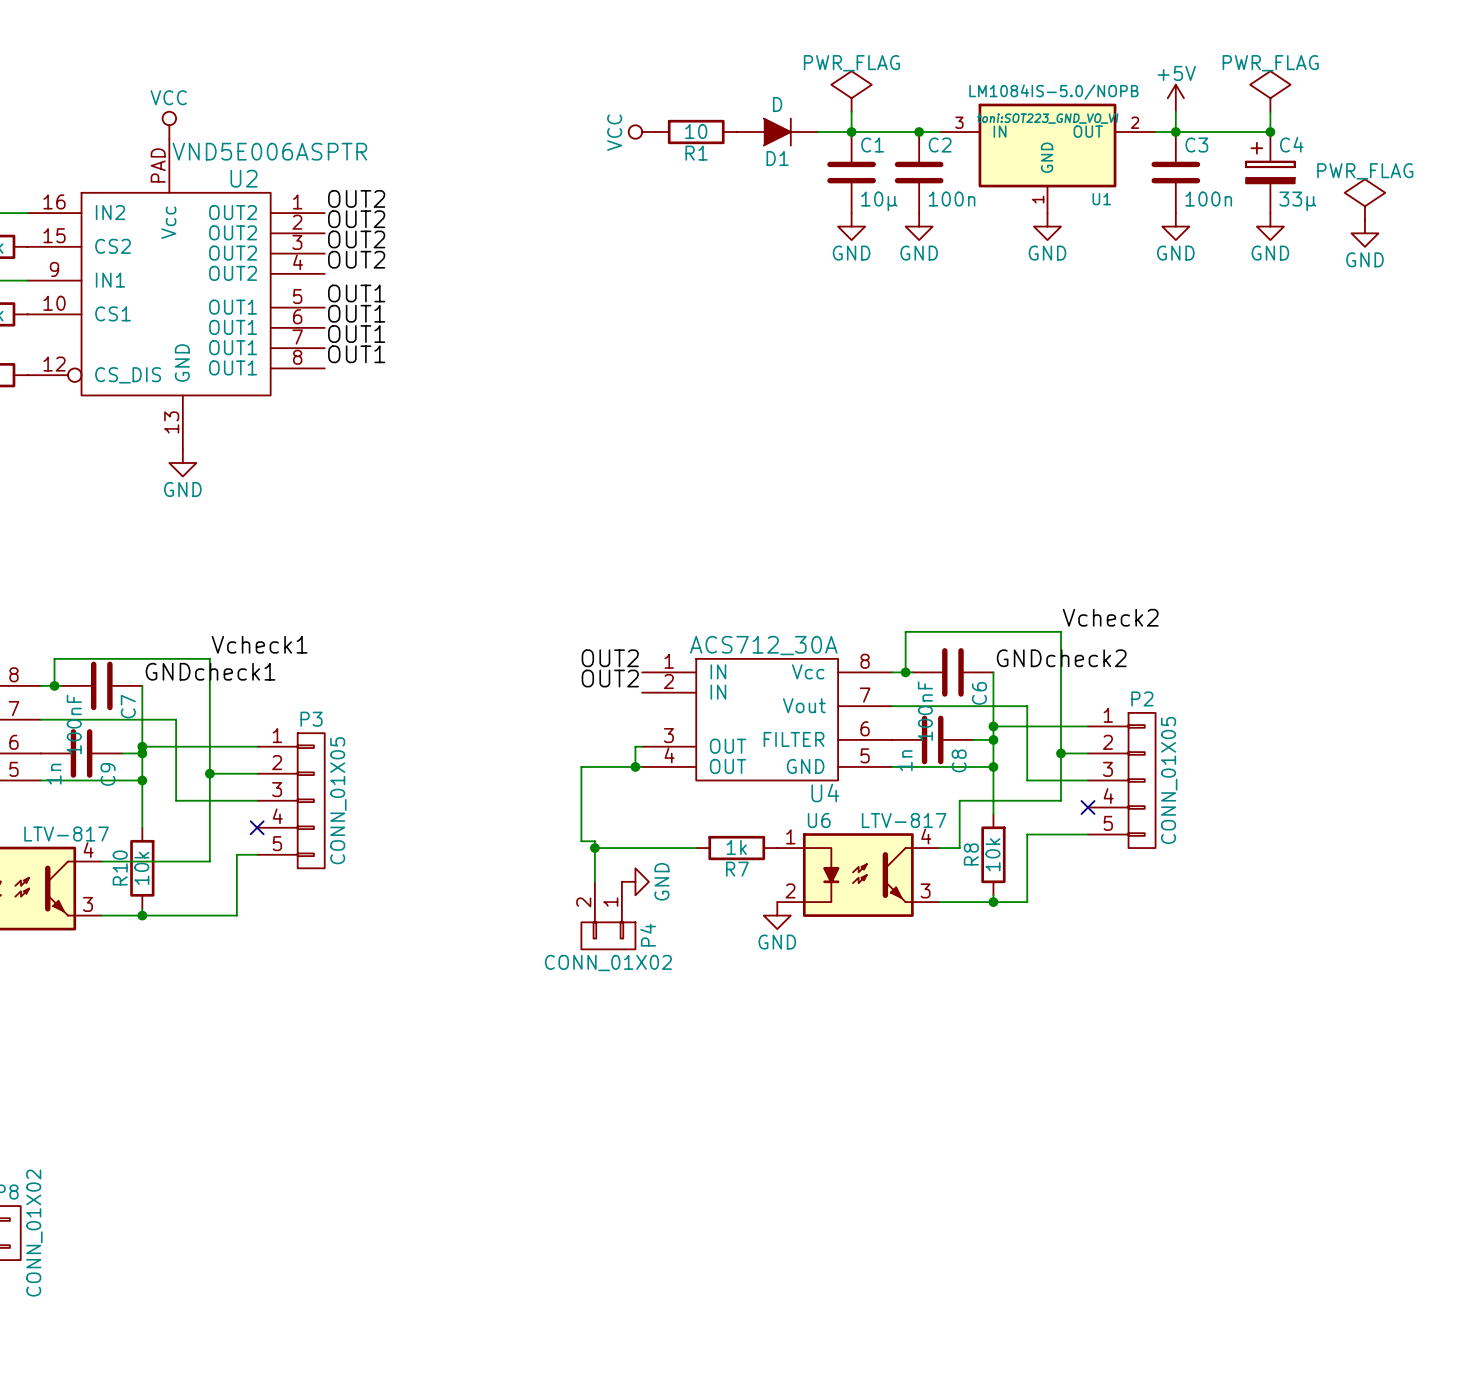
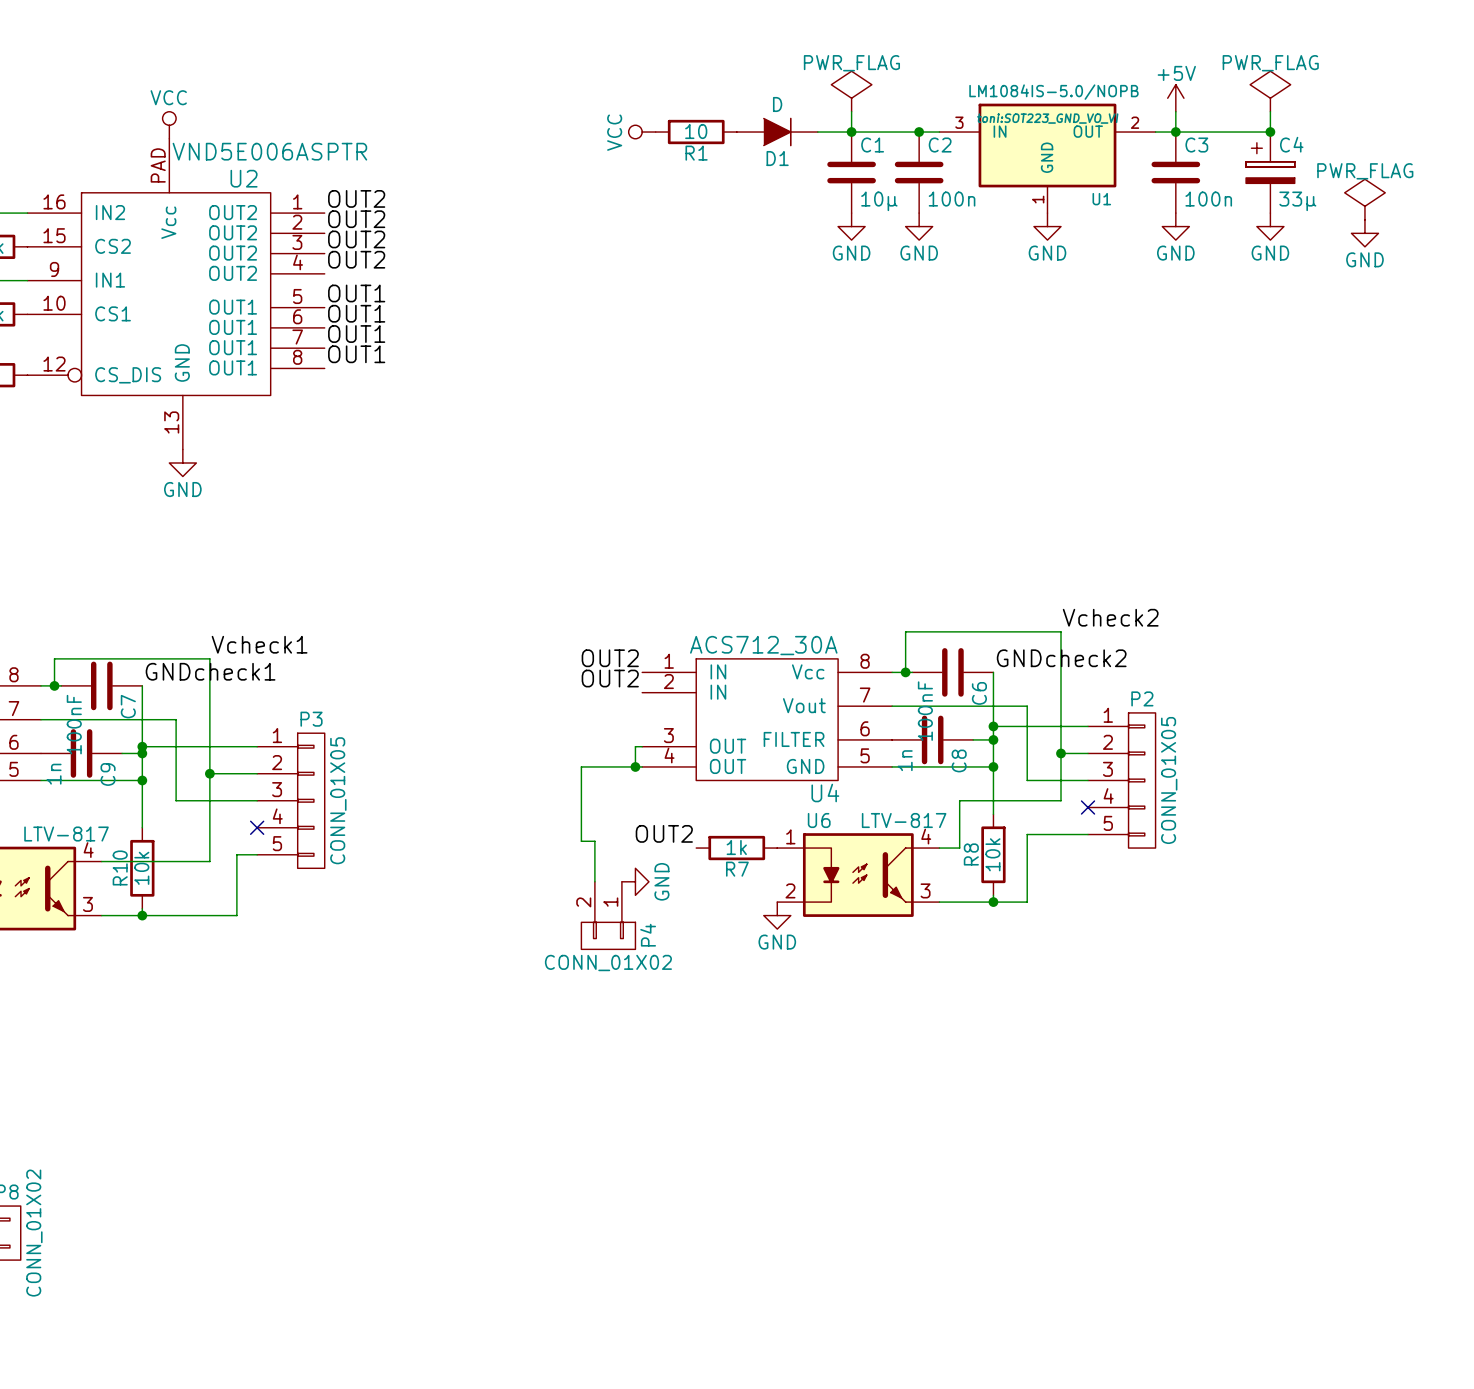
label: none -> OUT2 (664, 833)
wire: (594, 848) (696, 848) -> none
junction: (594, 848) -> none

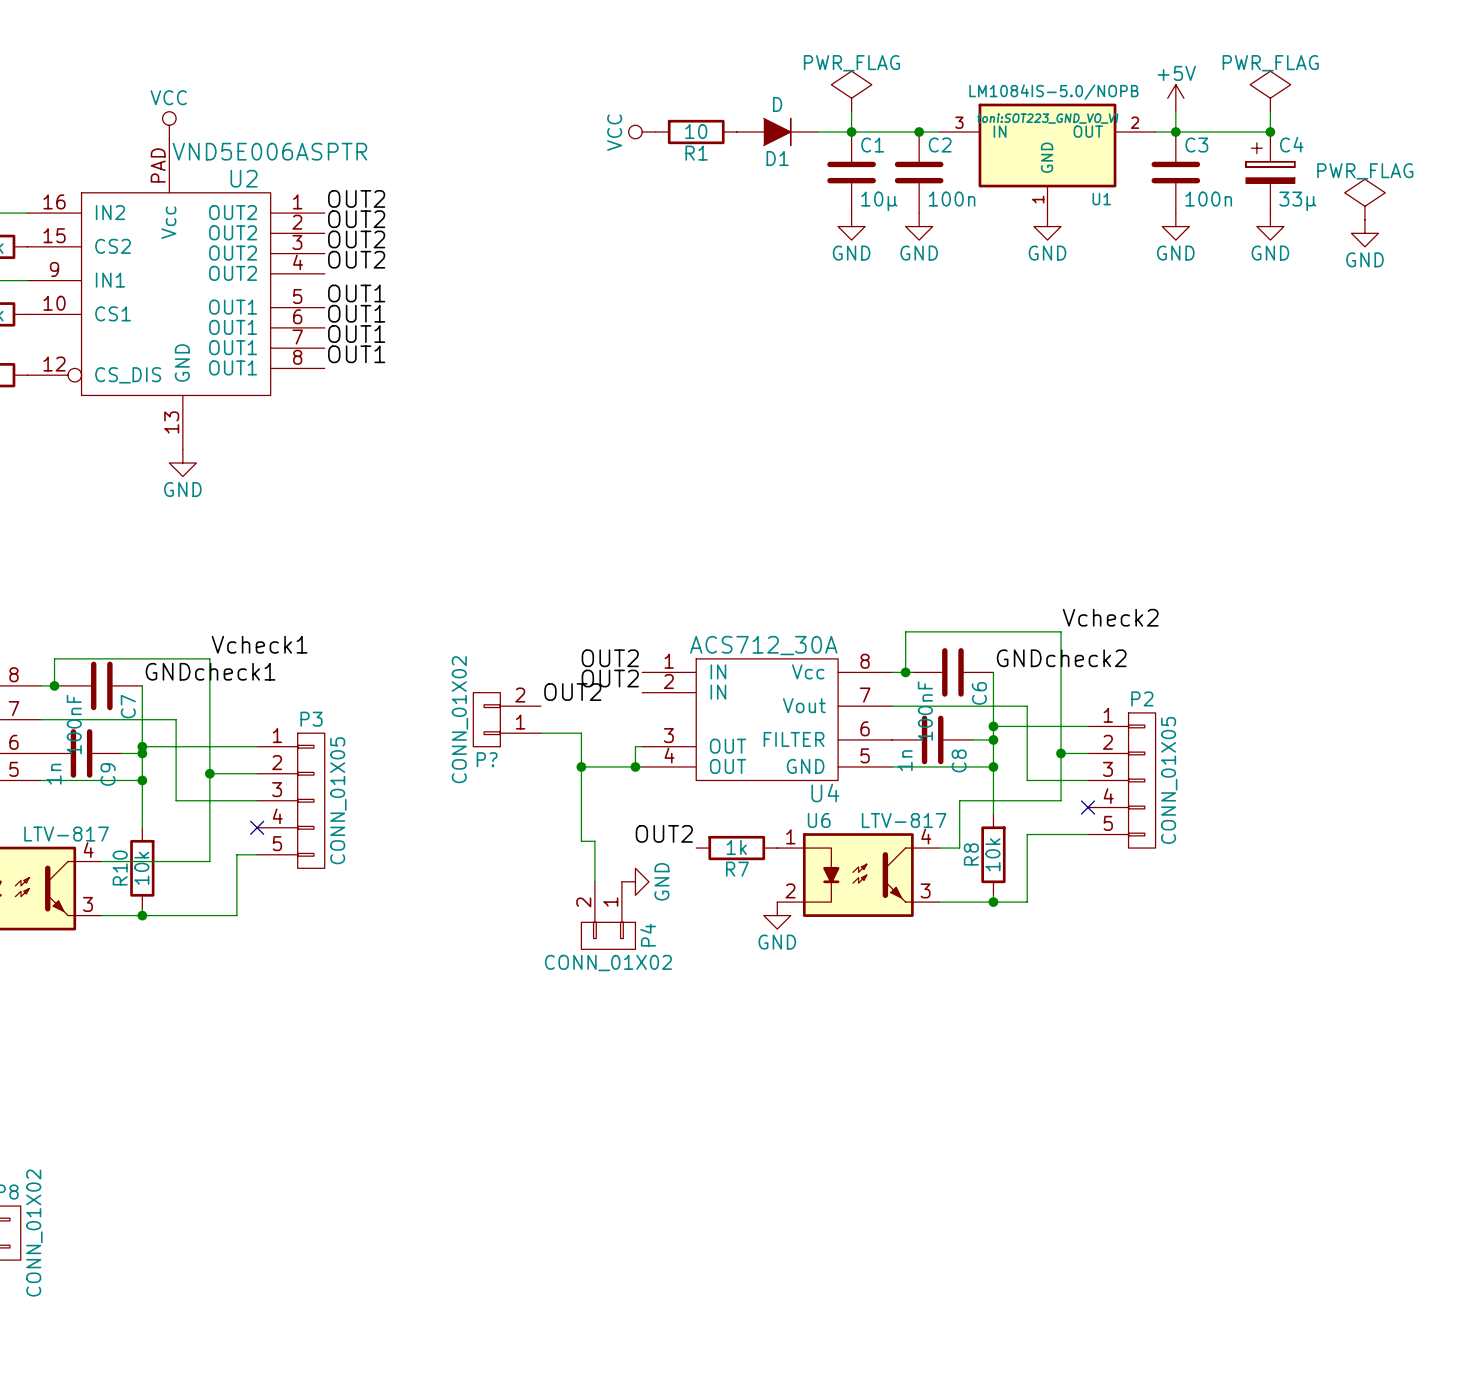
label: none -> OUT2 (572, 692)
P?: none -> CONN_01X02 (507, 719)
wire: none -> (540, 733) (581, 733) (581, 766)
junction: none -> (581, 766)

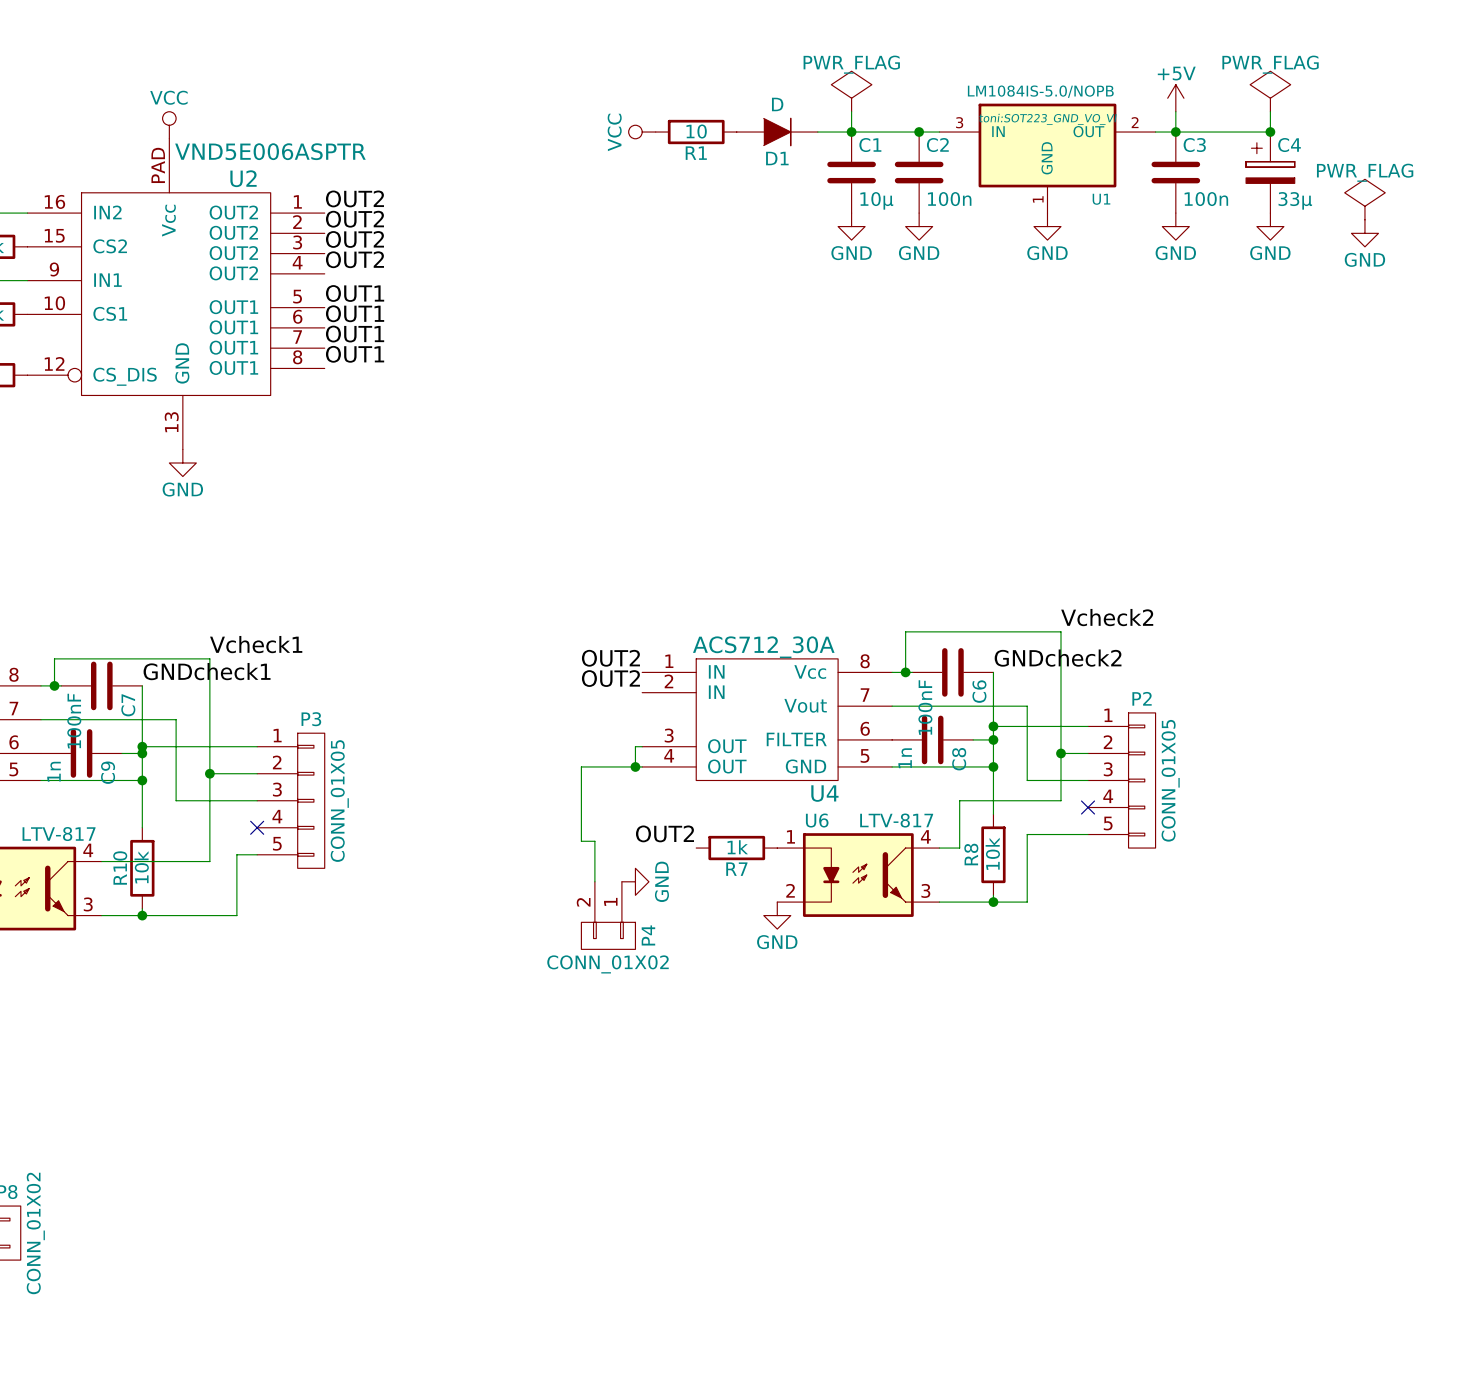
label: OUT2 (572, 692) -> none
P?: CONN_01X02 (507, 719) -> none
wire: (540, 733) (581, 733) (581, 766) -> none
junction: (581, 766) -> none

